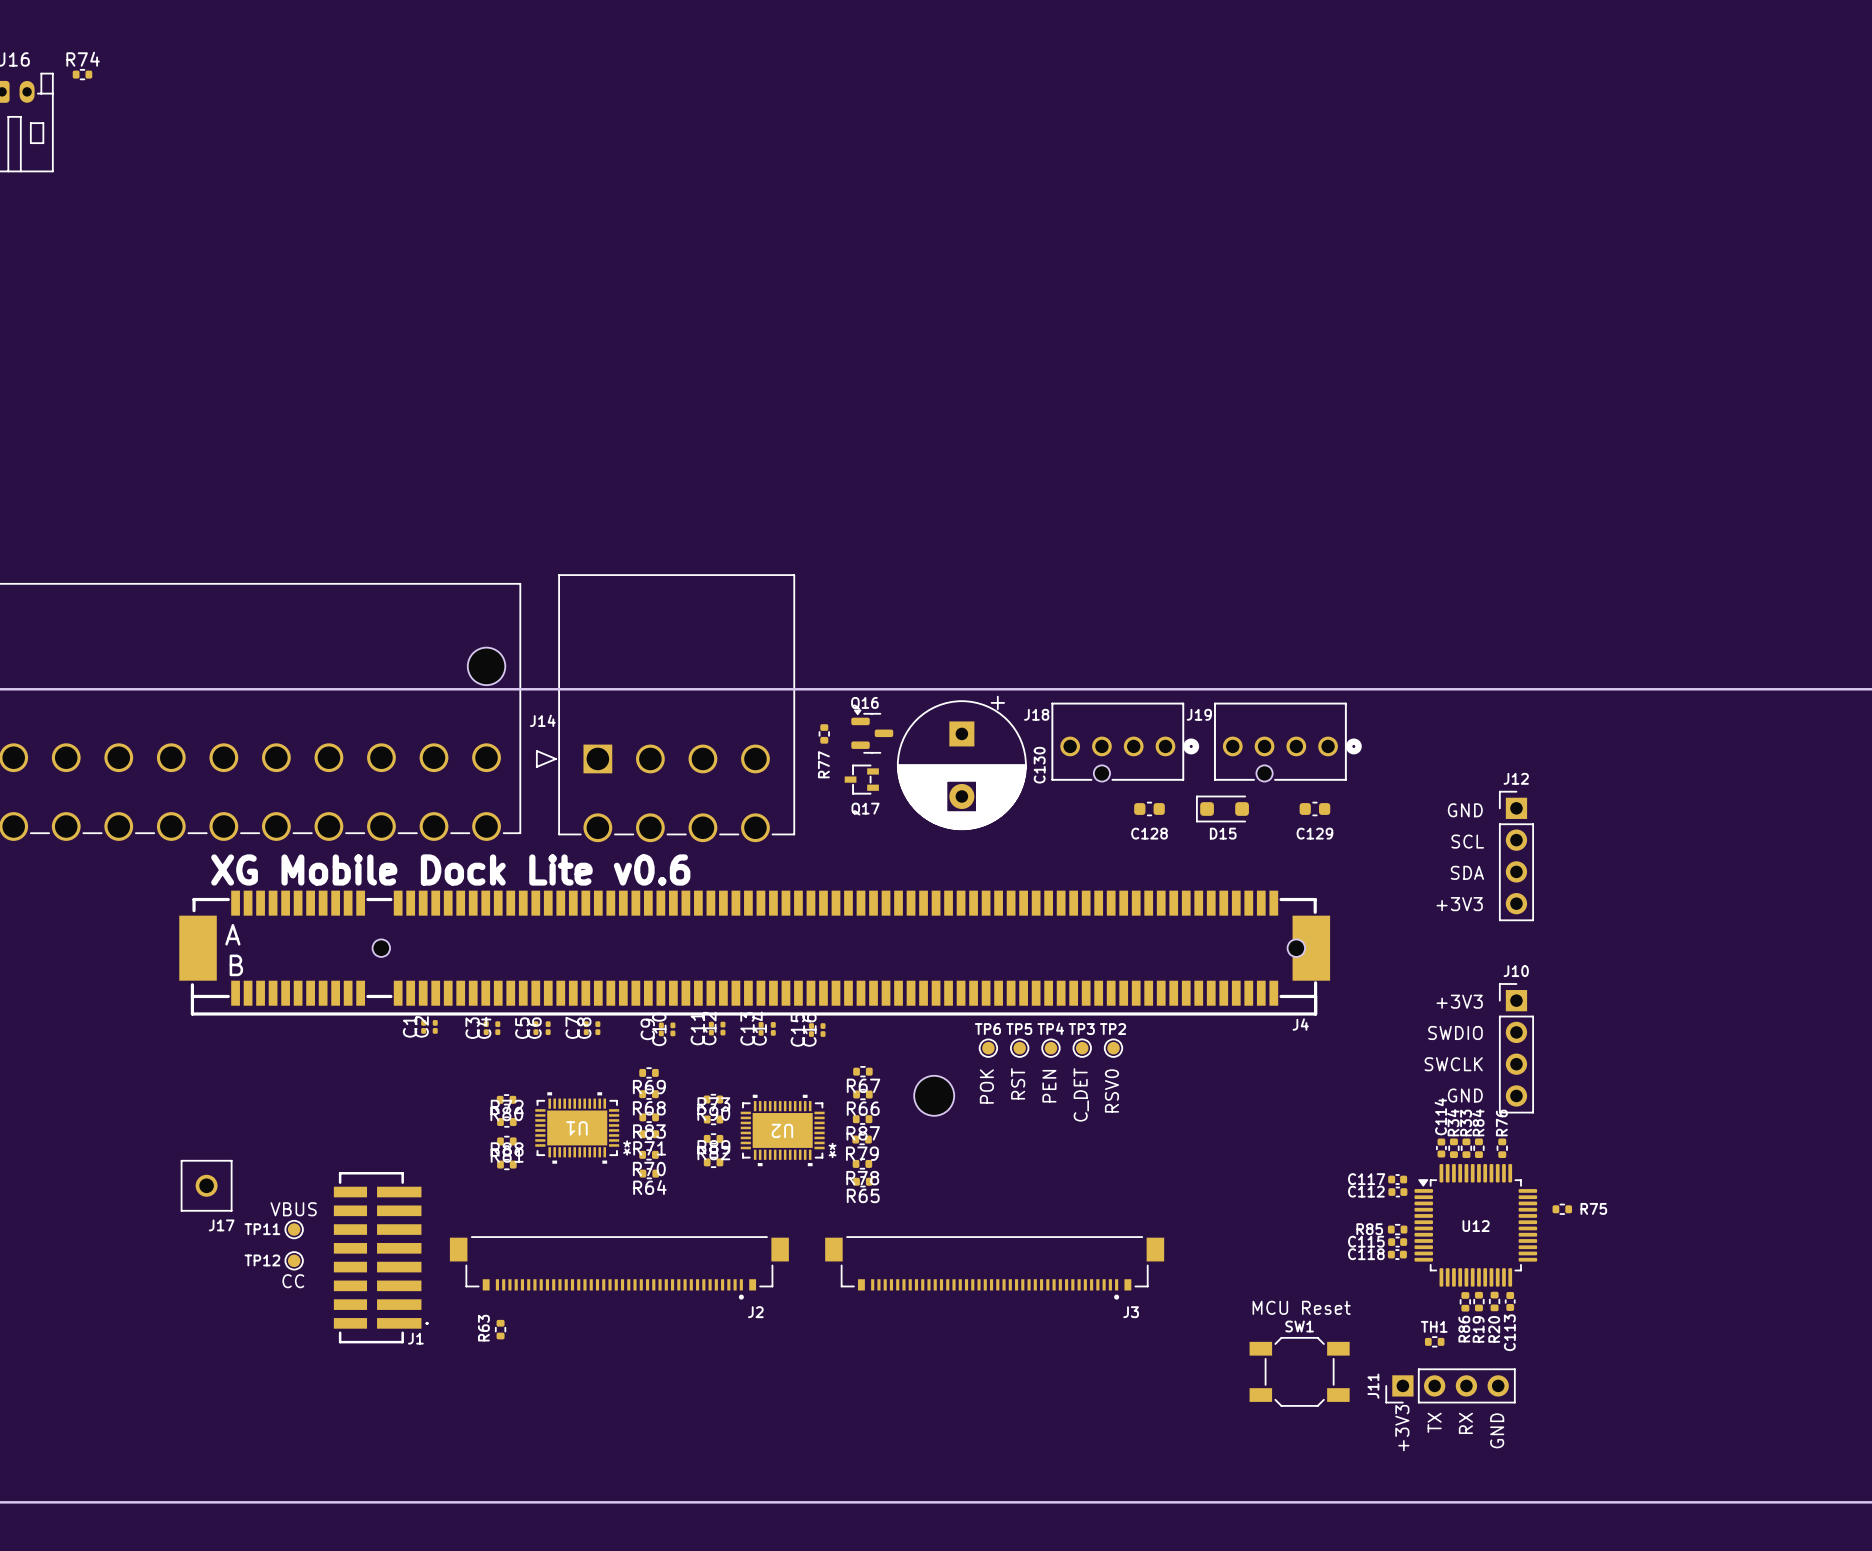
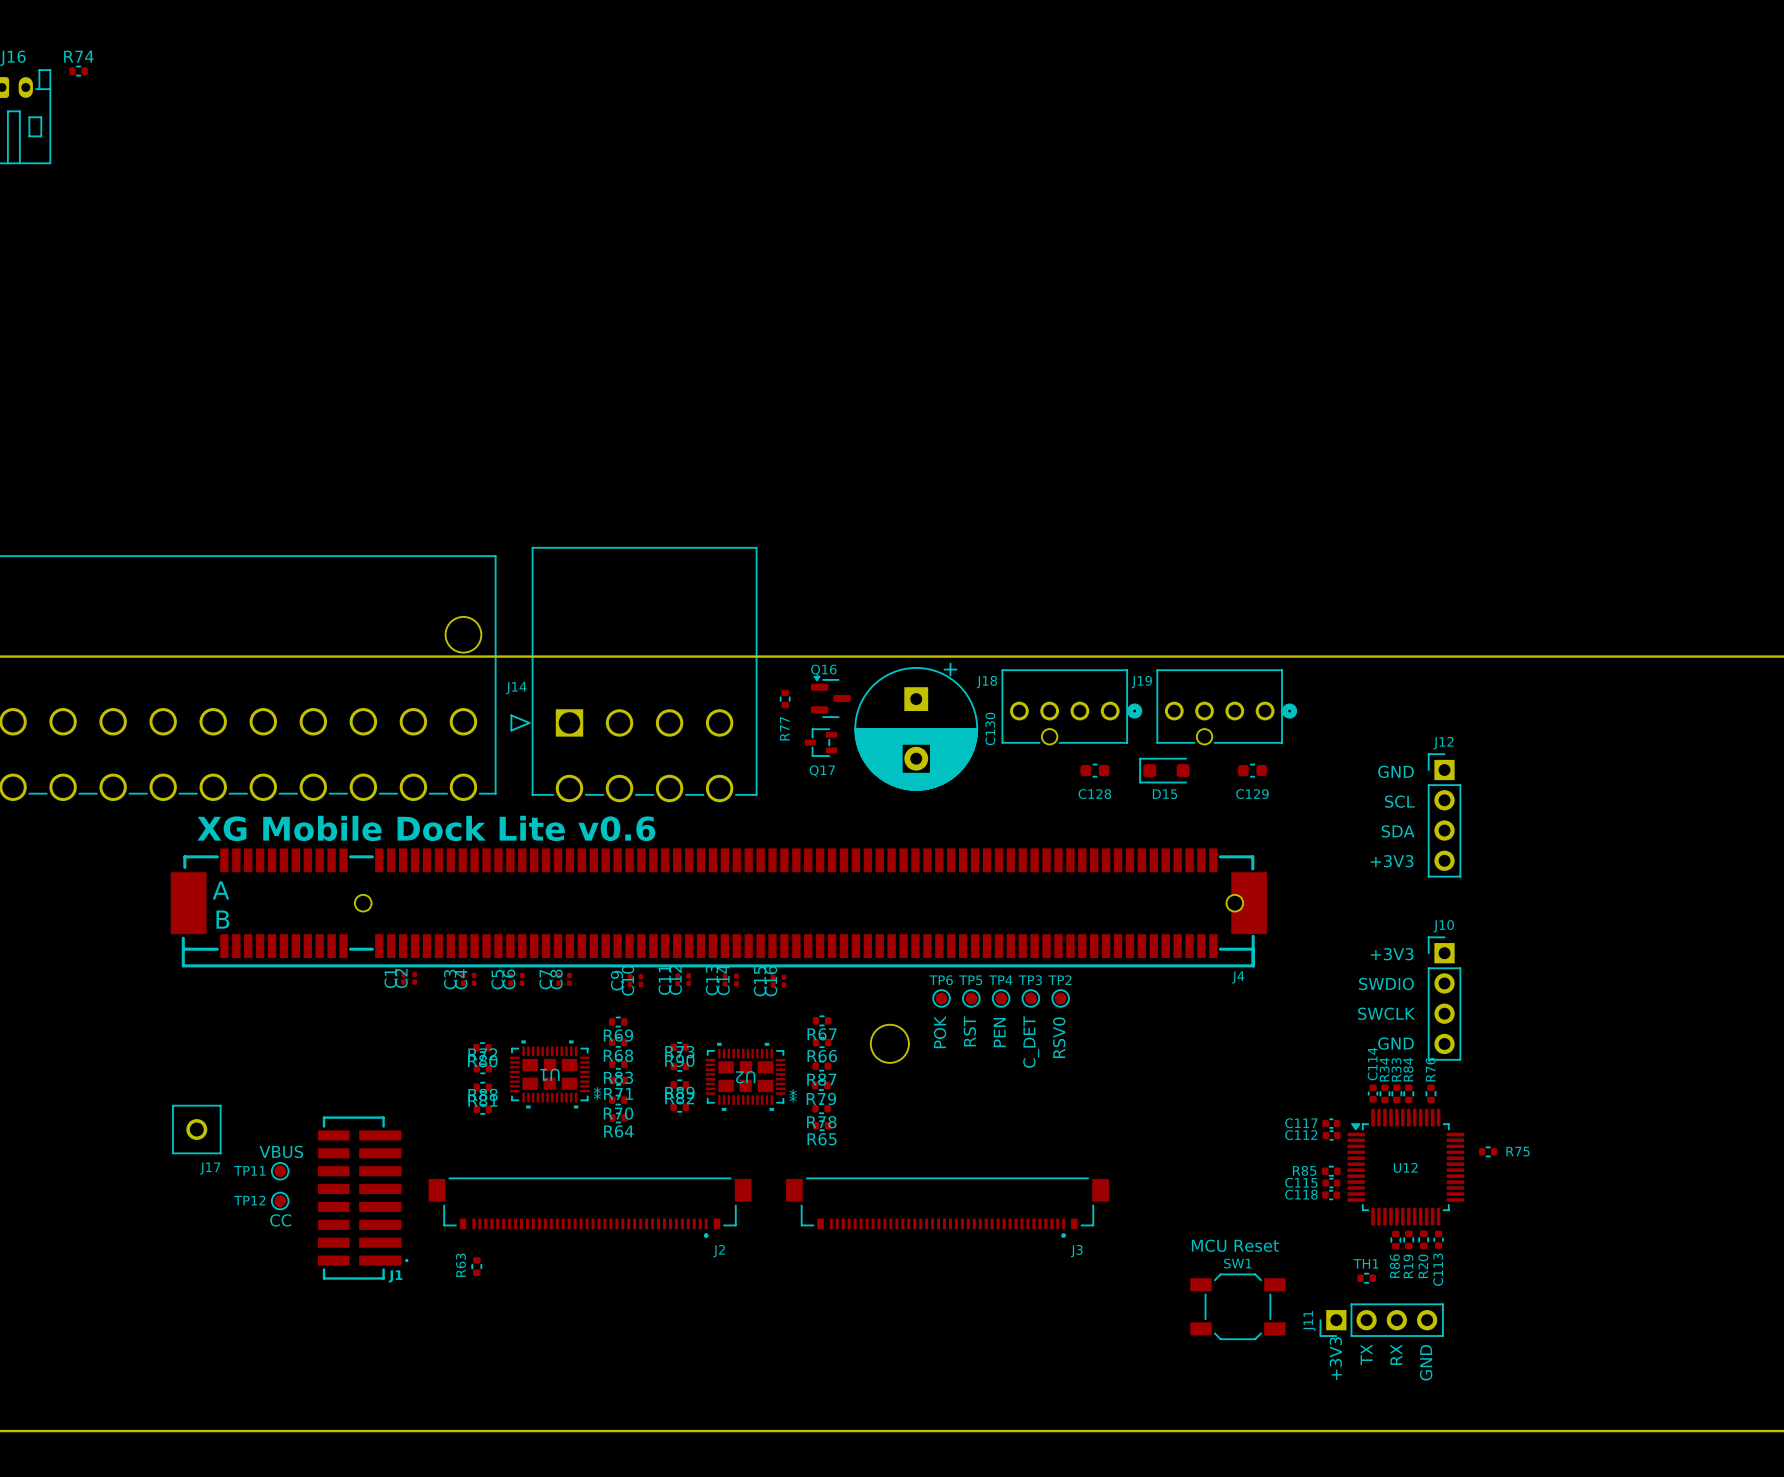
U1 footprint: [535, 1092, 620, 1164] -> [509, 1040, 590, 1109]
U2 footprint: [740, 1094, 825, 1167] -> [705, 1042, 786, 1111]

